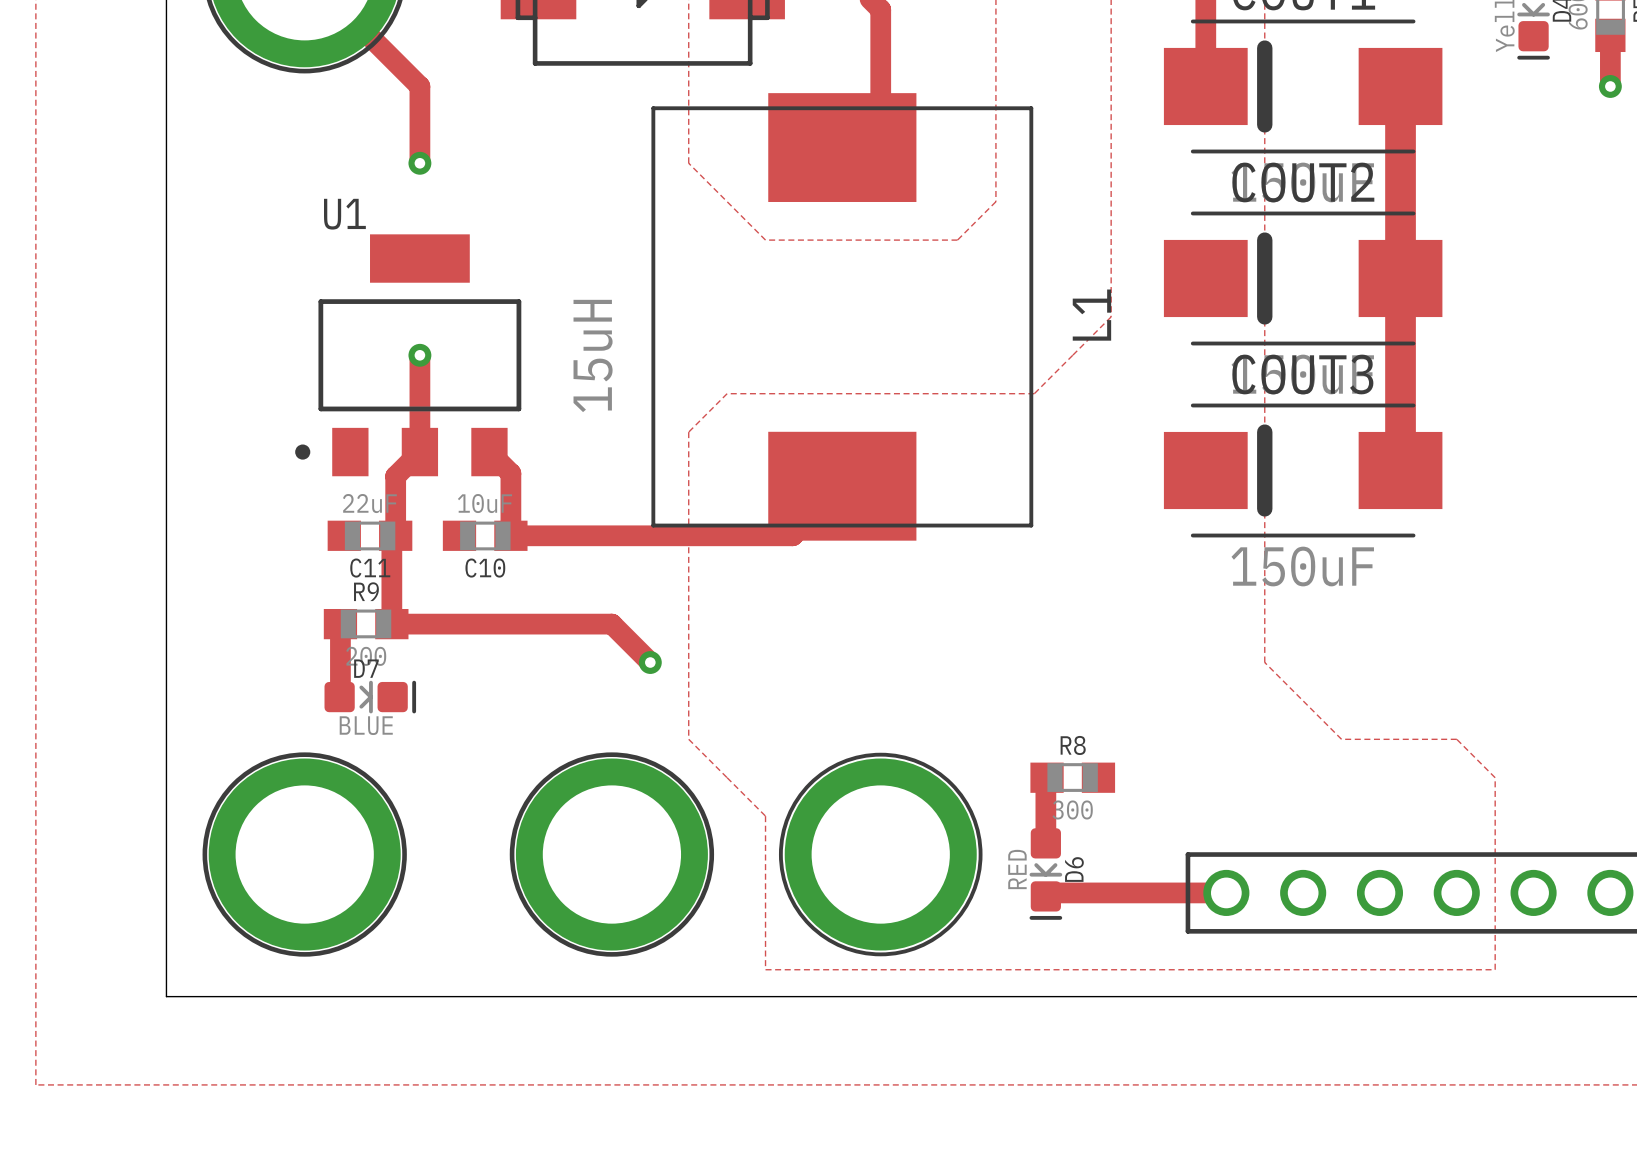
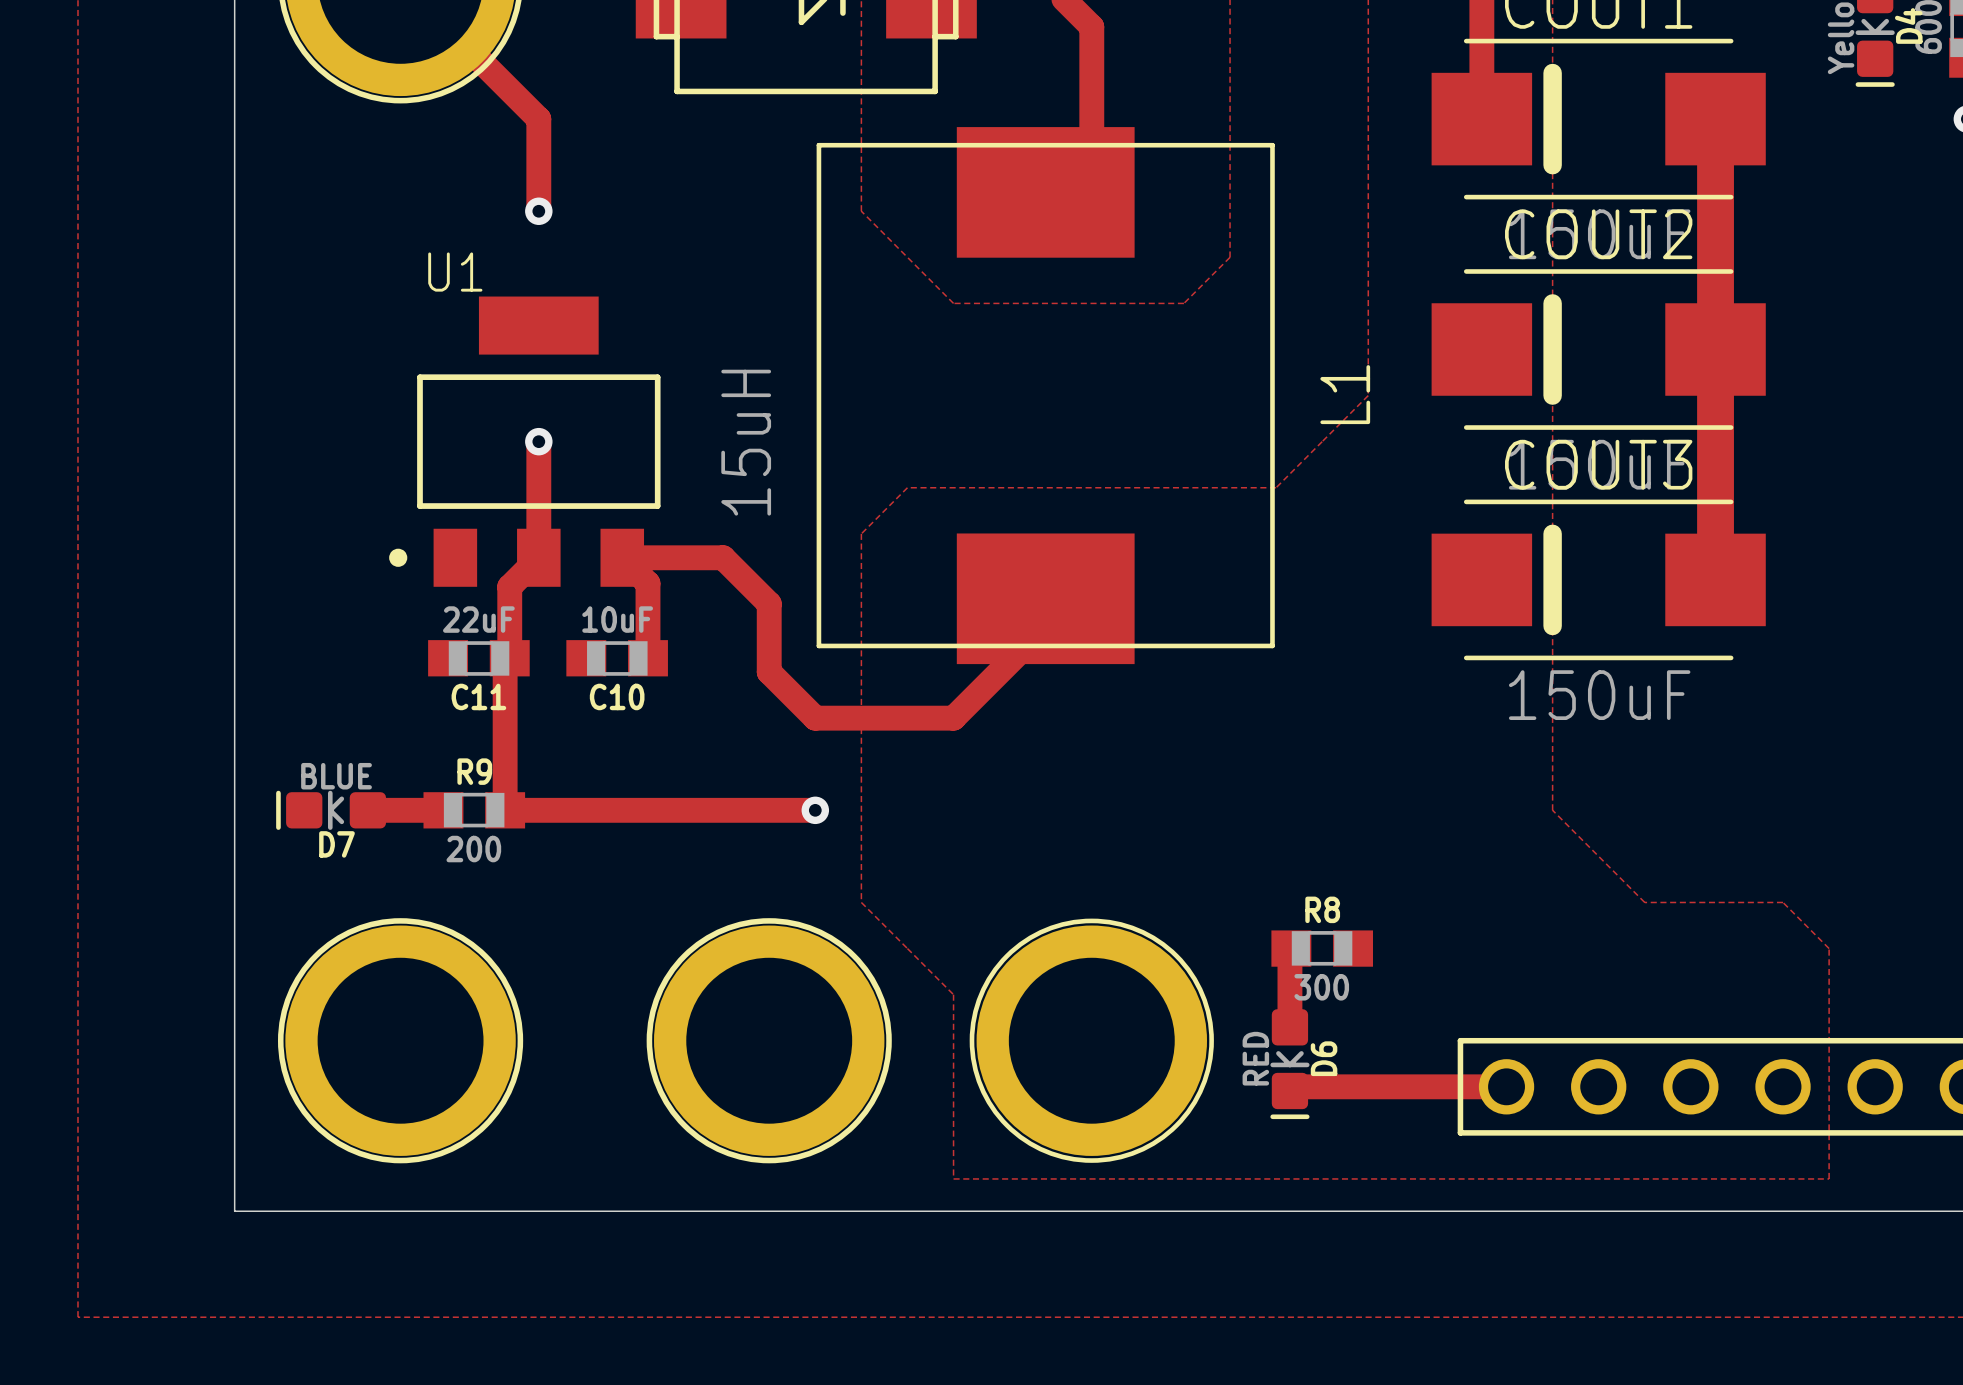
track: (842, 486) (792, 535) (510, 535) -> (1045, 598) (1045, 625) (953, 718) (815, 718) (769, 672) (769, 603) (723, 557) (622, 557)
track: (340, 624) (339, 697) -> none
R9 position: (366, 624) -> (474, 810)
track: (391, 624) (611, 624) (650, 662) -> (505, 764) (505, 810) (815, 810)
track: none -> (367, 810) (443, 810)
D7 rotation: 0° (370, 697) -> 180° (331, 810)
D7 position: (370, 697) -> (331, 810)

